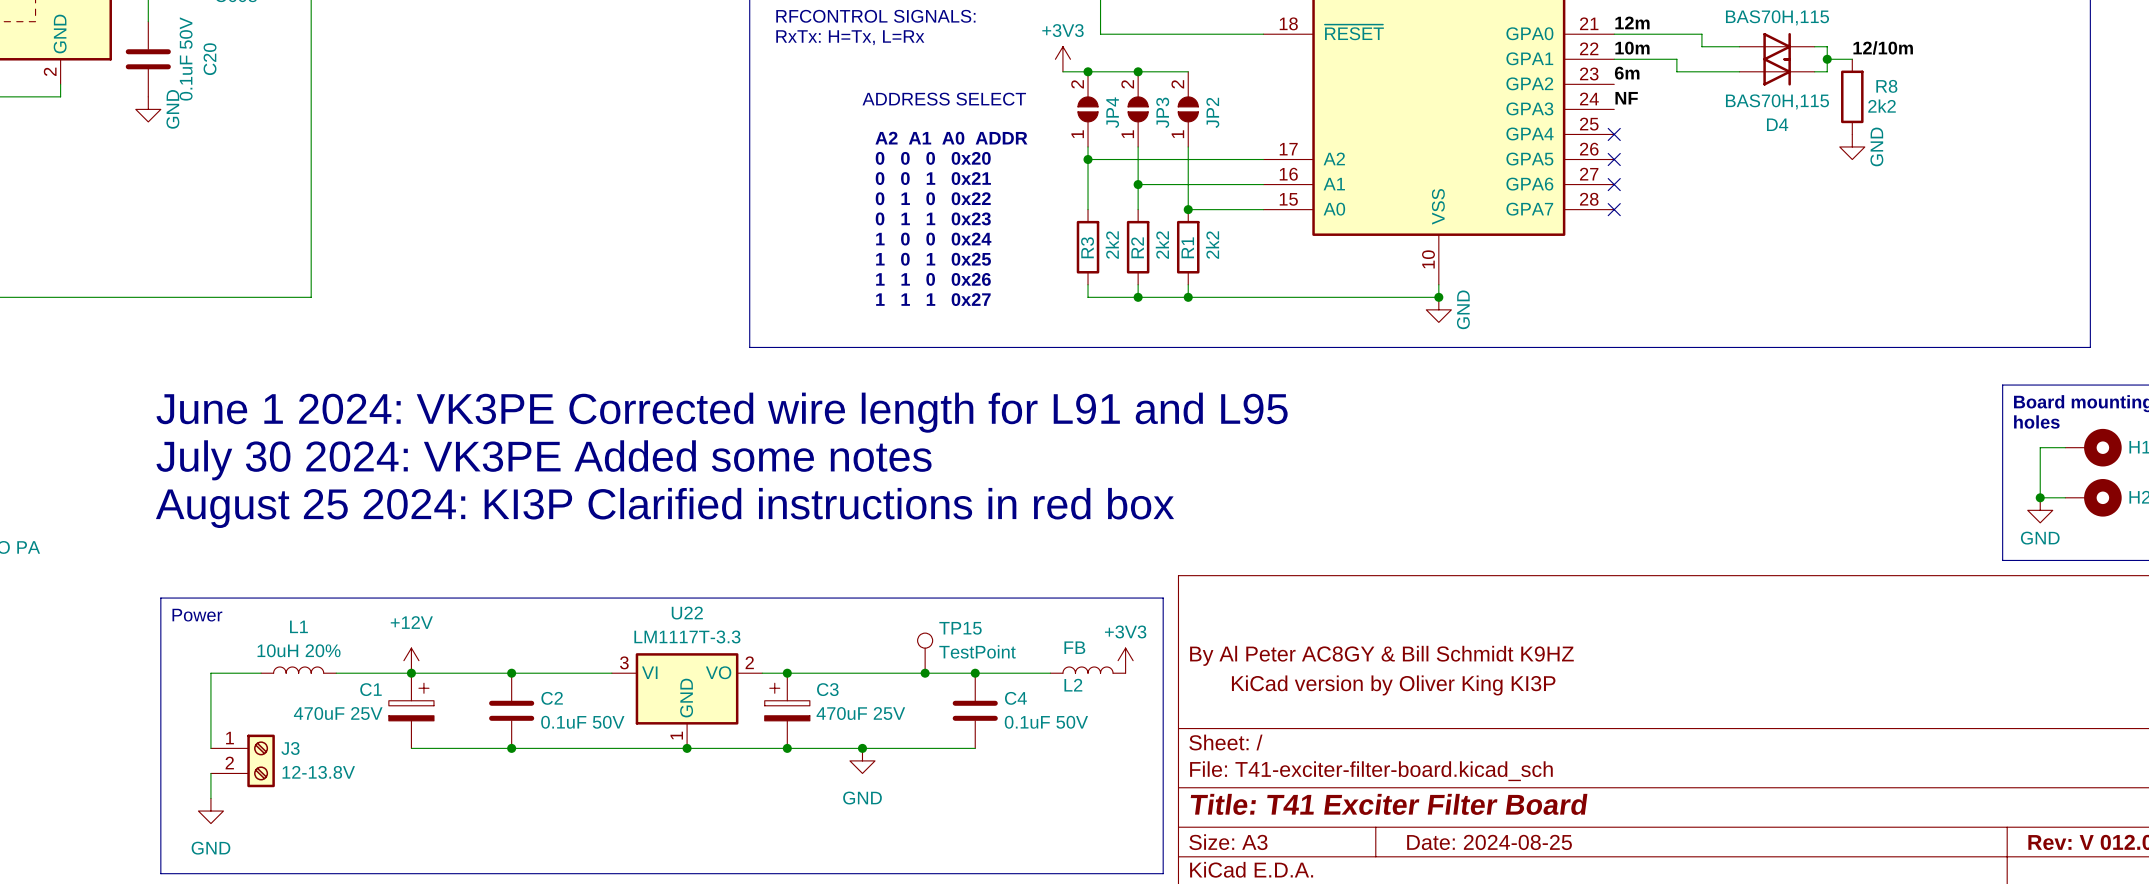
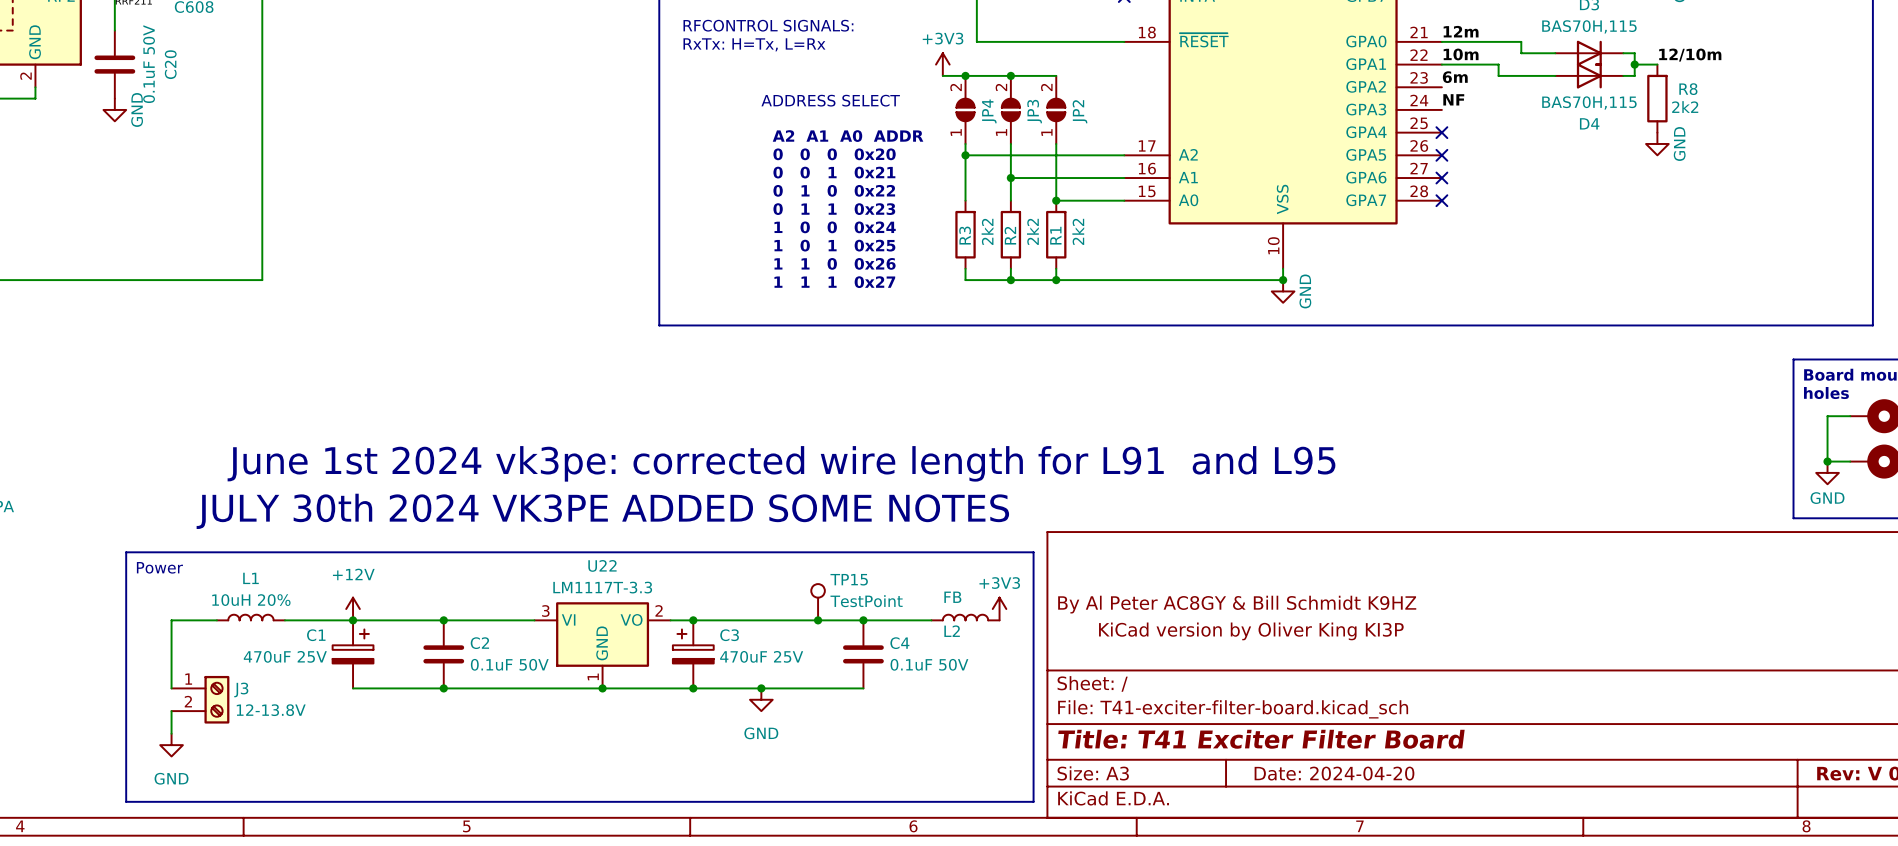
text: June 1 2024: VK3PE Corrected wire length for L91 and L95 (722, 412) -> none
text: July 30 2024: VK3PE Added some notes (544, 460) -> none
text: none -> June 1st 2024 vk3pe: corrected wire length for L91 and L95 (781, 463)
text: August 25 2024: KI3P Clarified instructions in red box (665, 507) -> none
text: none -> JULY 30th 2024 VK3PE ADDED SOME NOTES (602, 511)
title block: Date: 2024-08-25 (1489, 842) -> Date: 2024-04-20 (1334, 773)

